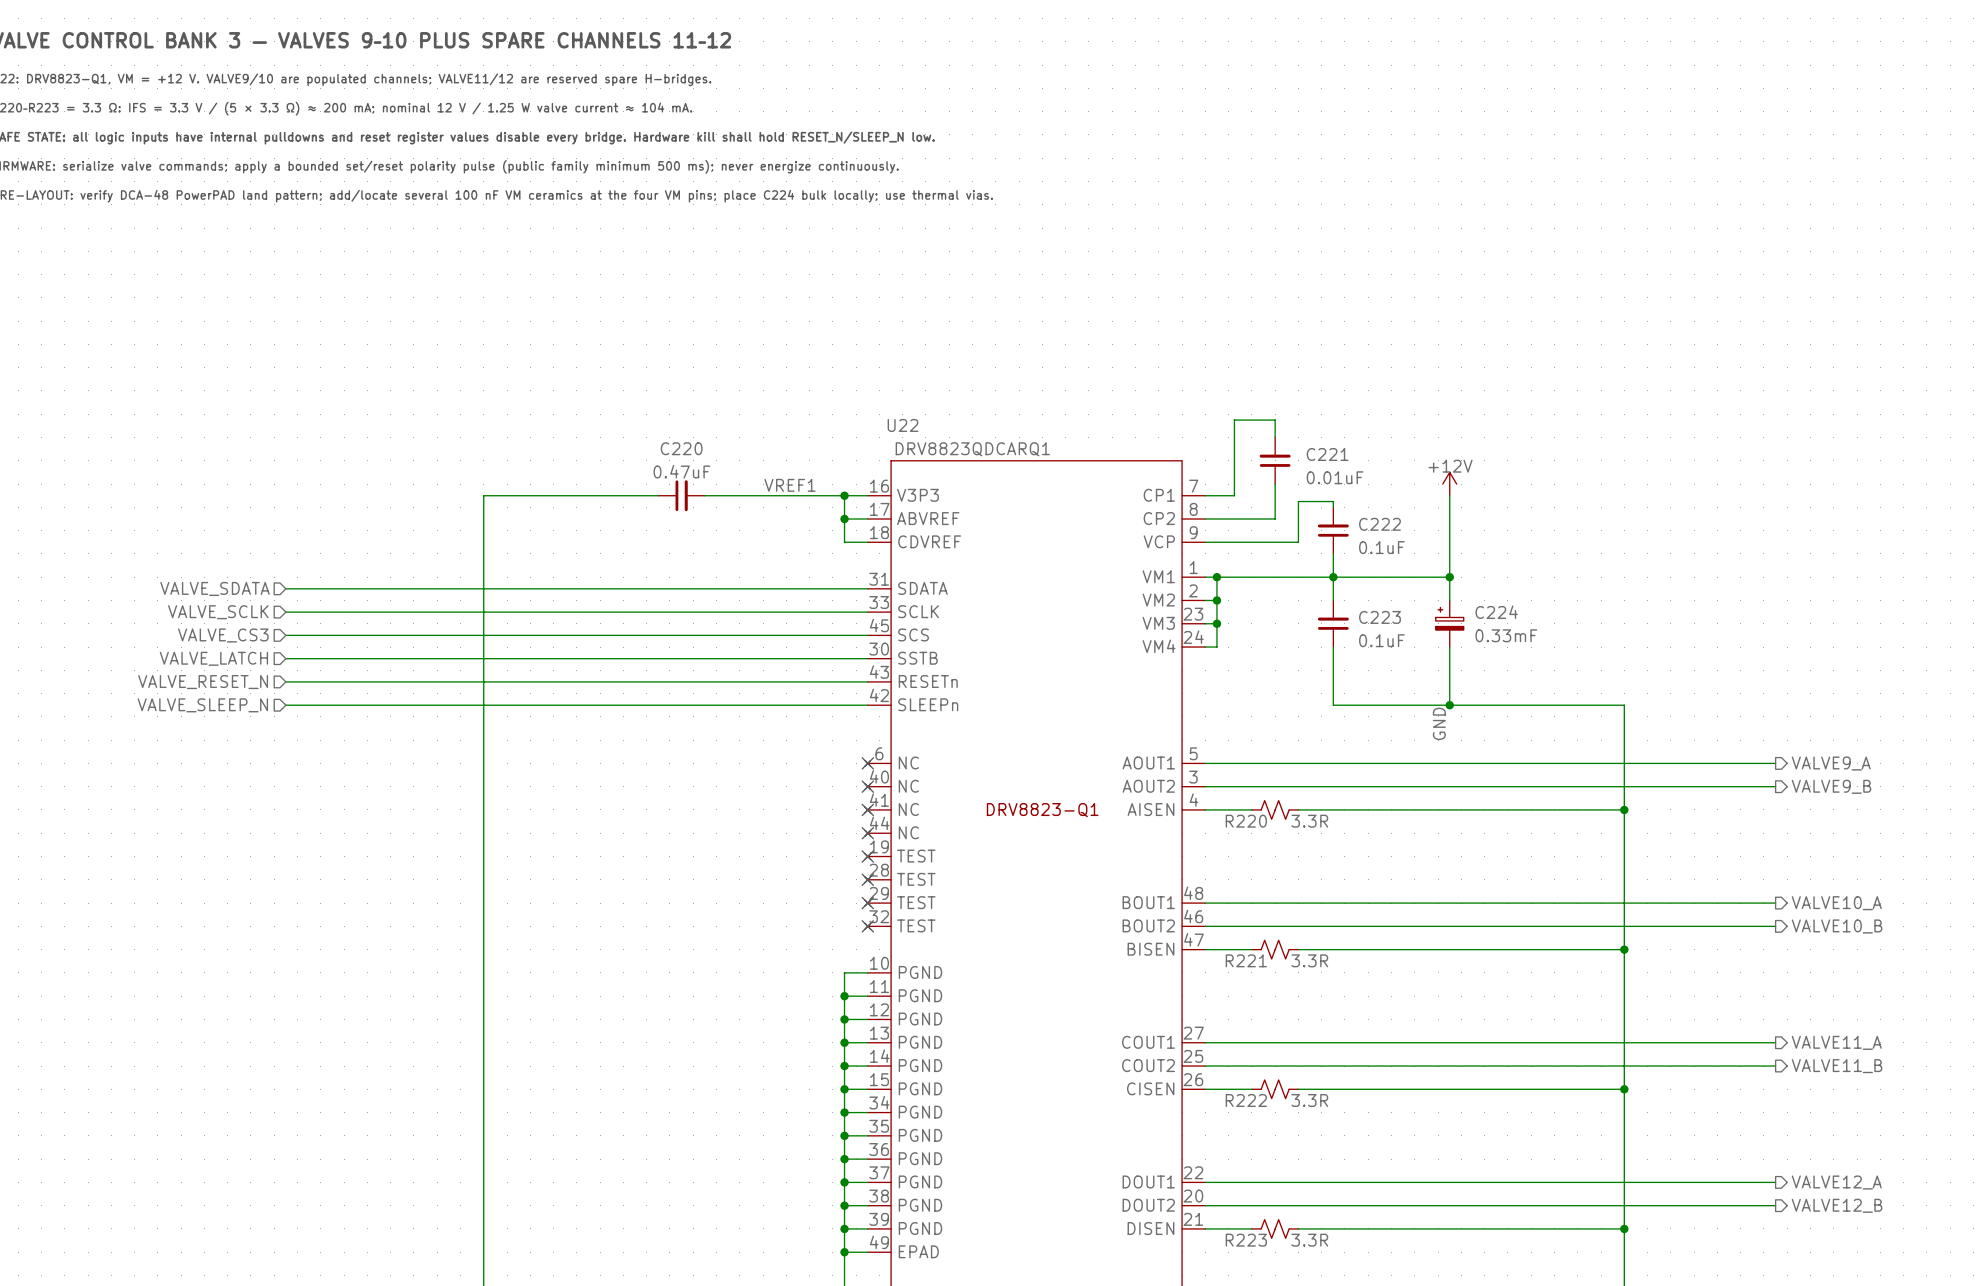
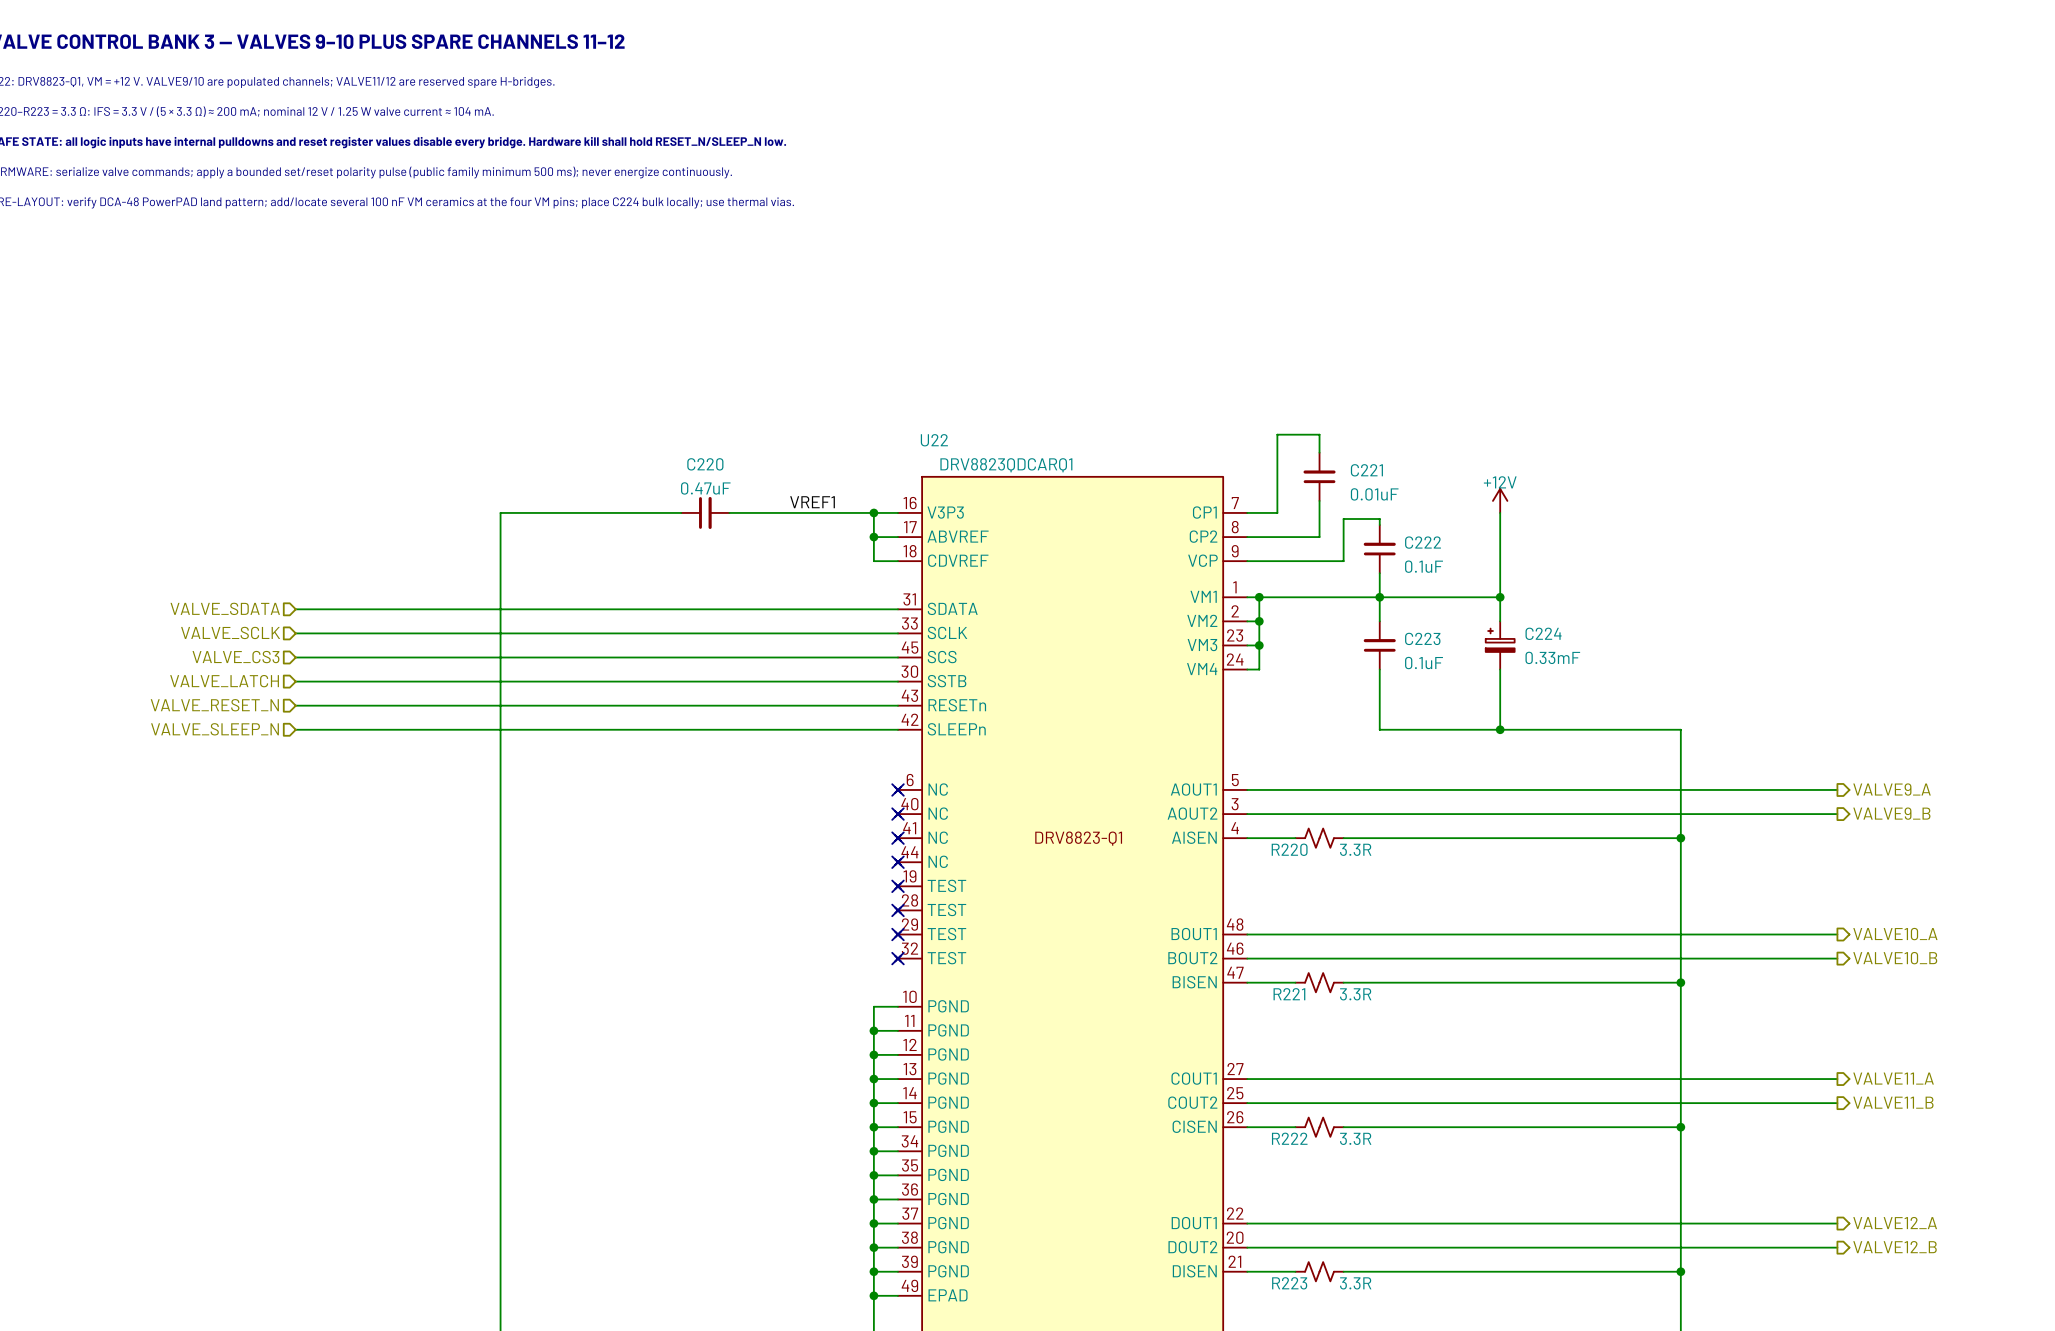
label: GND (1439, 723) -> none

